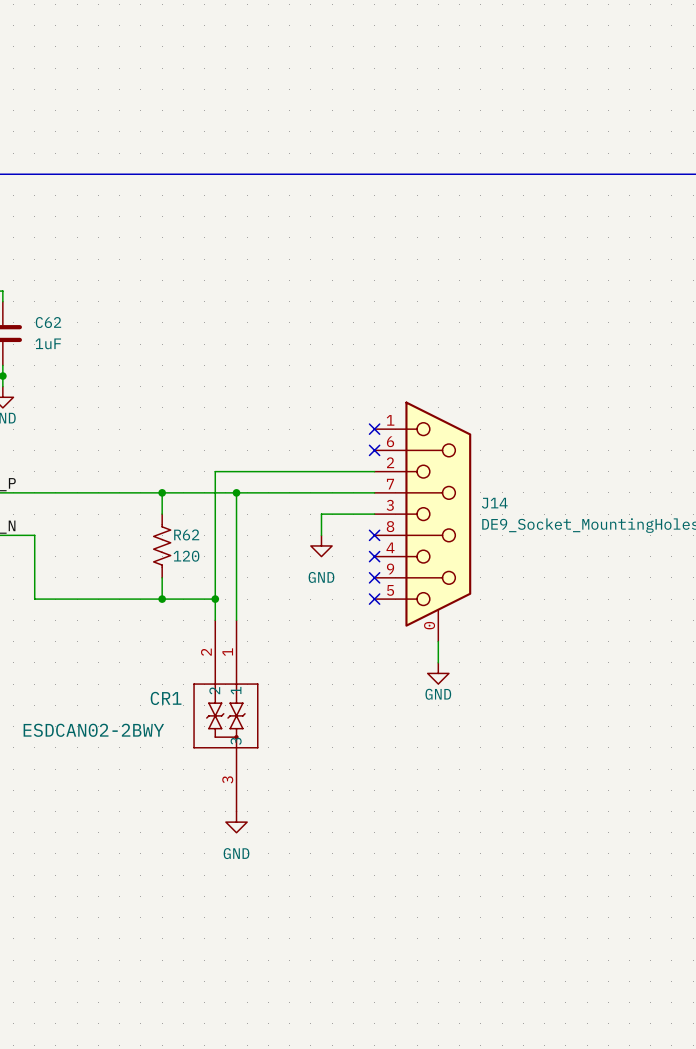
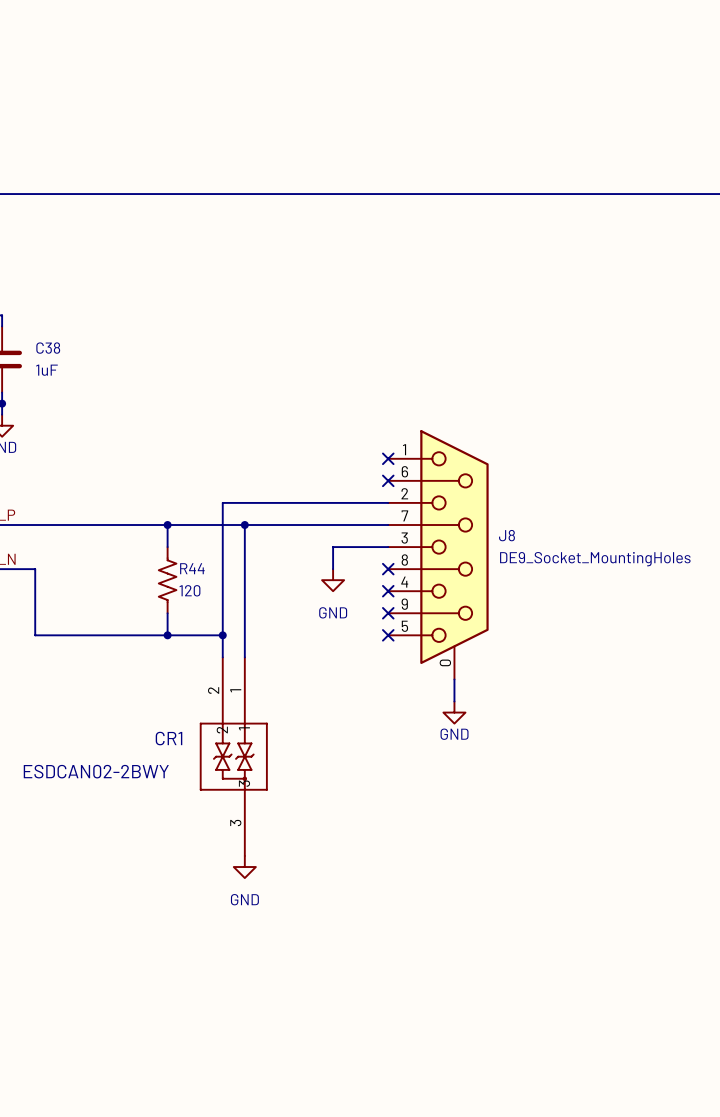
C62 name: C62 (48, 322) -> C38 (48, 348)
J14 name: J14 (494, 503) -> J8 (506, 535)
R62 name: R62 (186, 534) -> R44 (192, 568)

